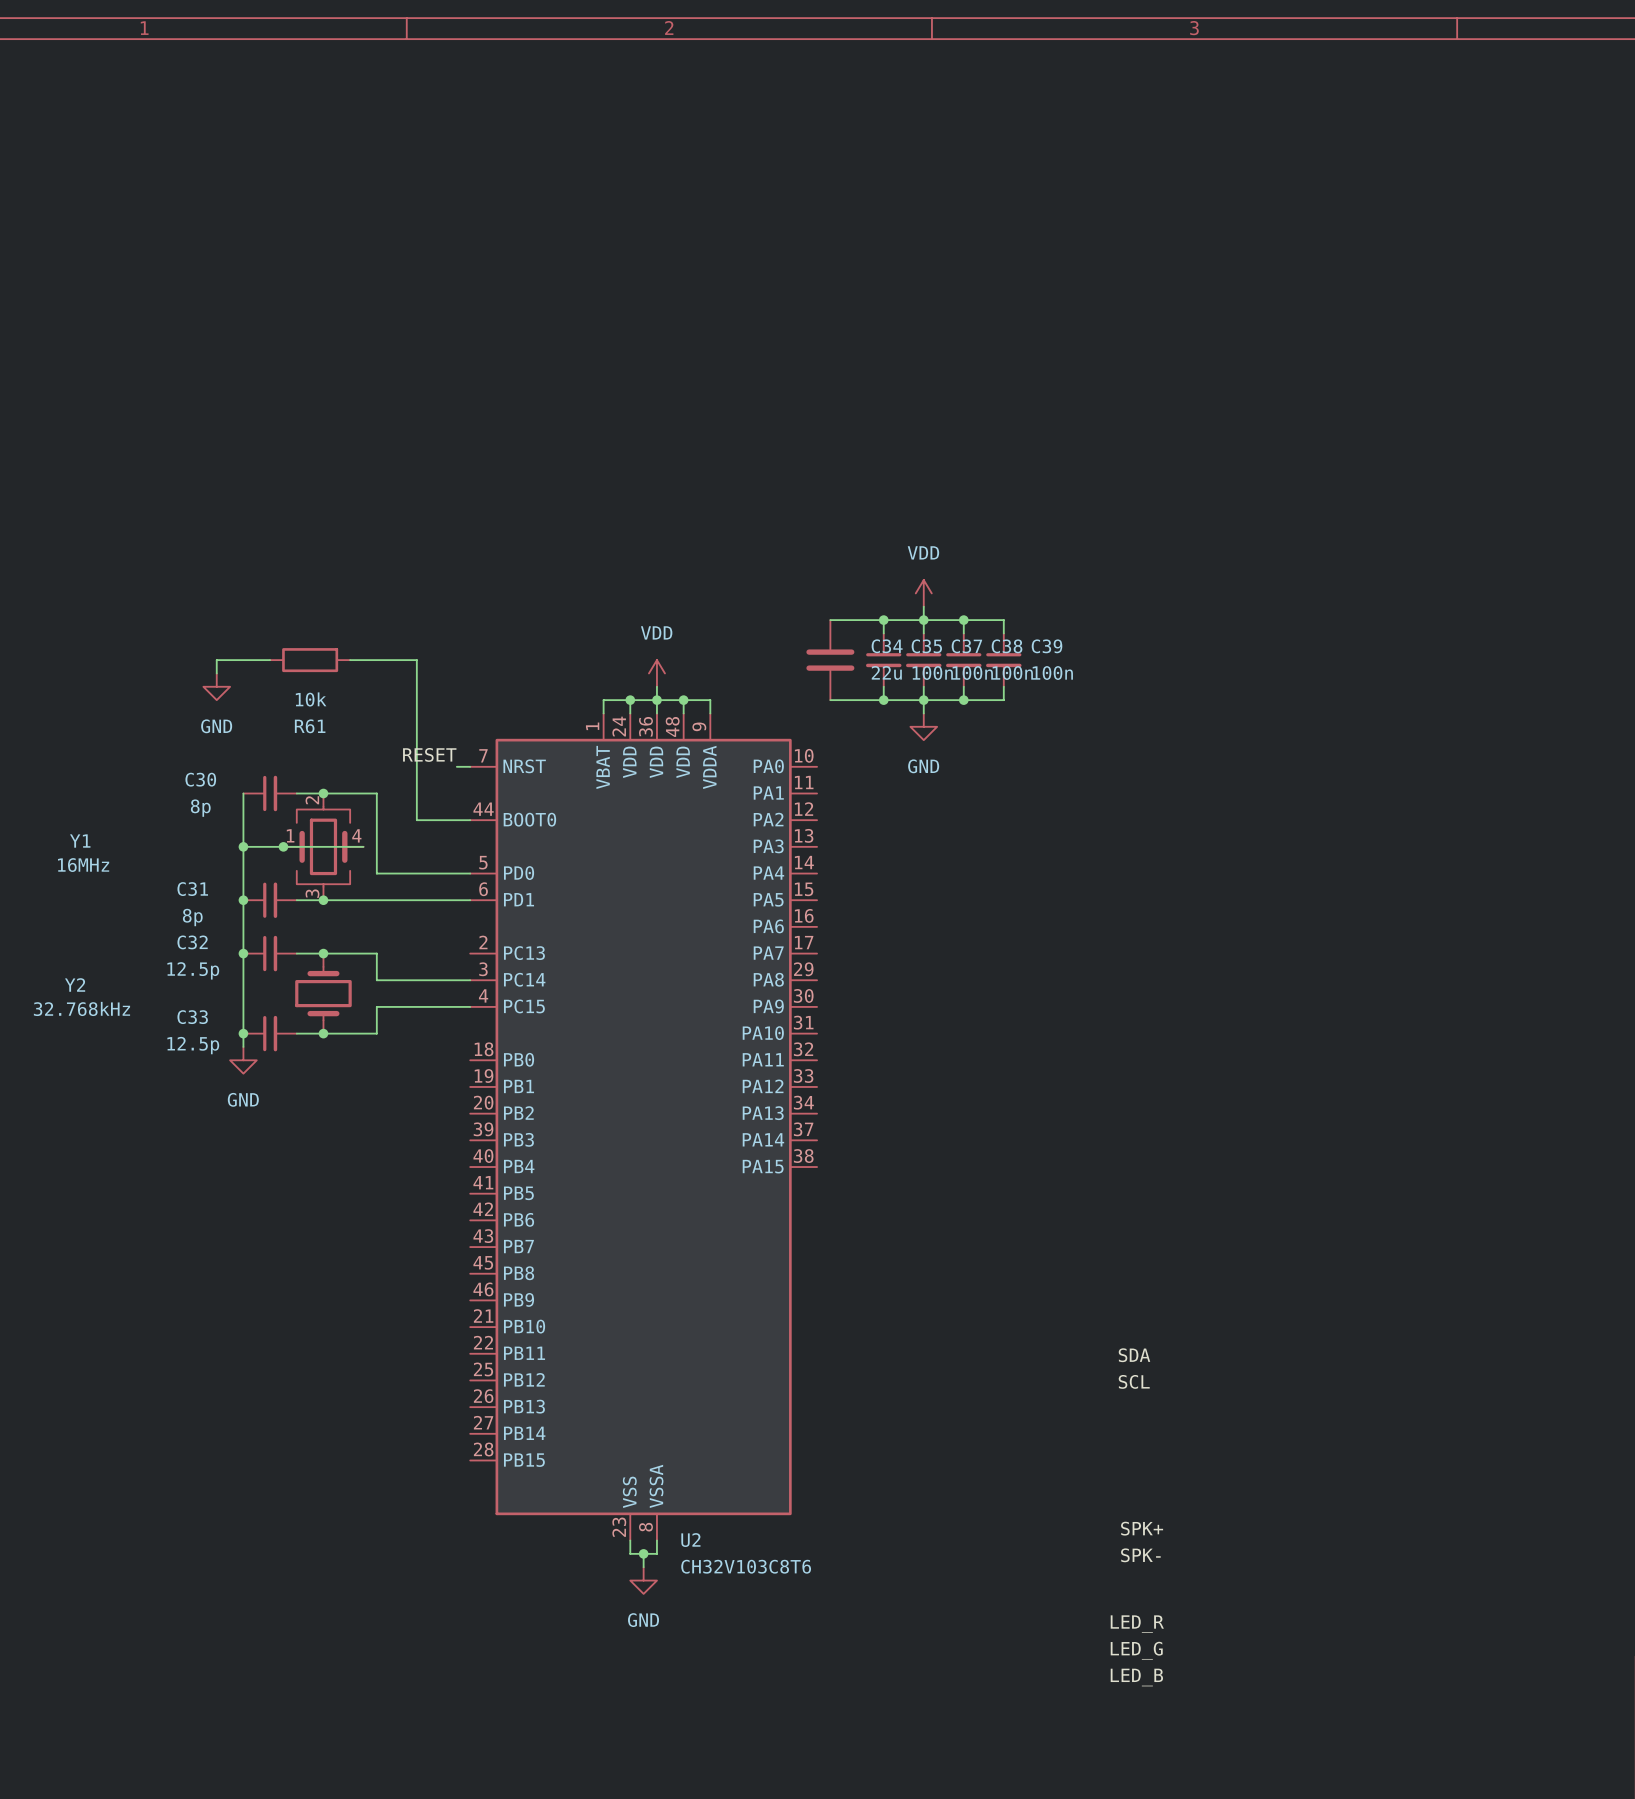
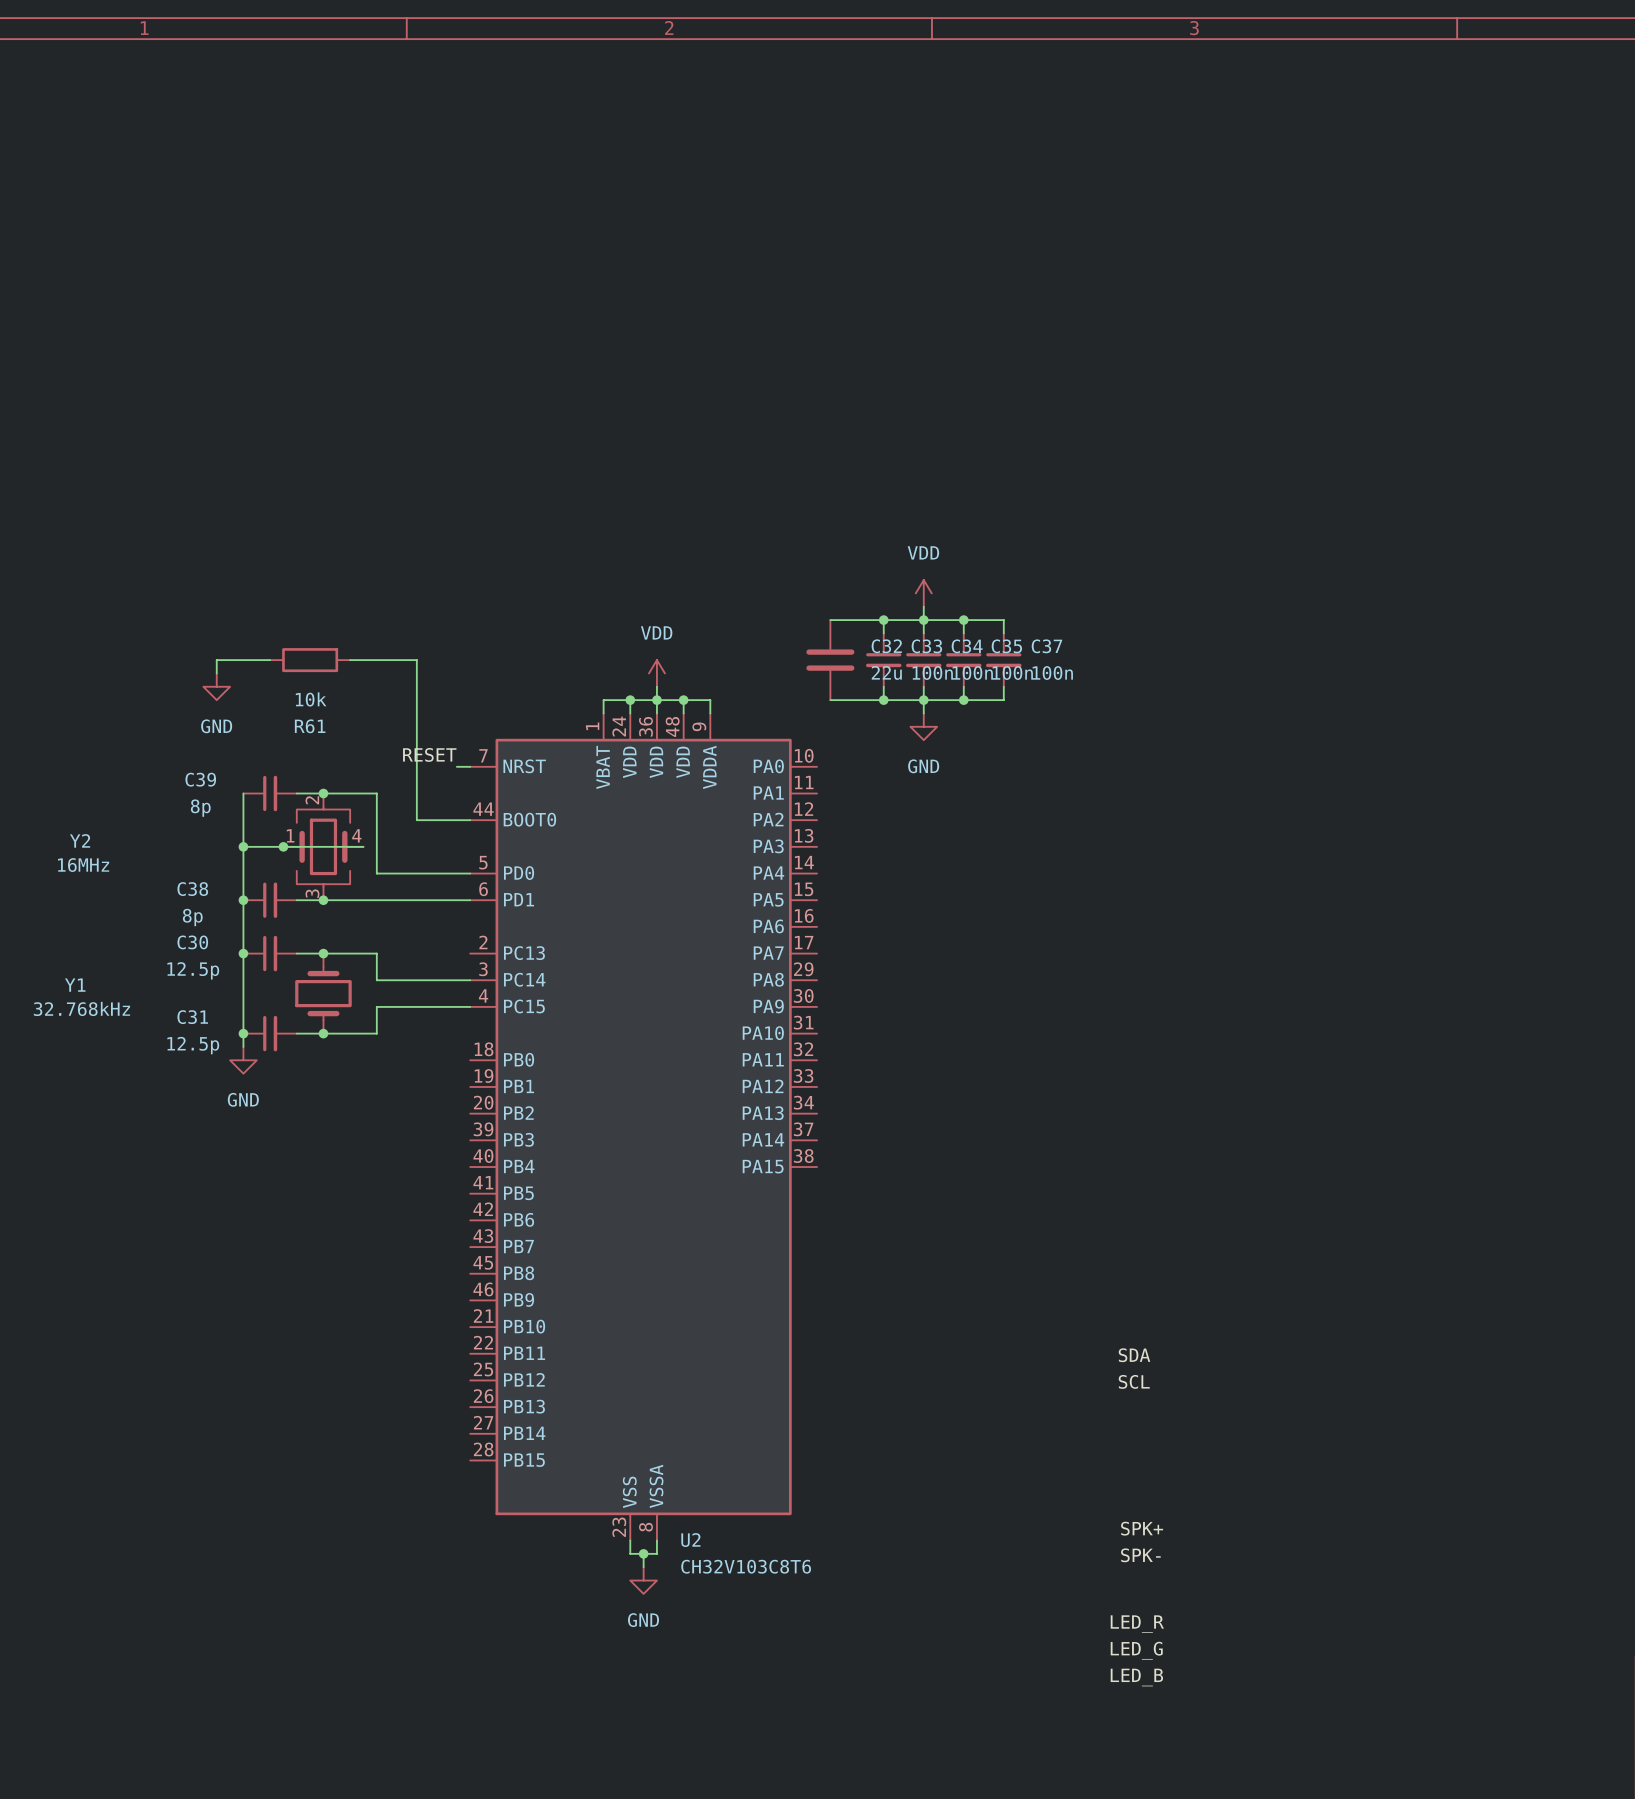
C34 name: C34 (887, 646) -> C32 (886, 646)
C35 name: C35 (926, 646) -> C33 (926, 646)
C37 name: C37 (966, 646) -> C34 (967, 646)
C38 name: C38 (1007, 646) -> C35 (1006, 646)
C39 name: C39 (1047, 646) -> C37 (1046, 646)
C30 name: C30 (200, 779) -> C39 (200, 779)
Y1 name: Y1 (80, 841) -> Y2 (80, 840)
C31 name: C31 (192, 889) -> C38 (192, 889)
C32 name: C32 (192, 942) -> C30 (192, 942)
Y2 name: Y2 (75, 984) -> Y1 (75, 985)
C33 name: C33 (192, 1017) -> C31 (192, 1017)

